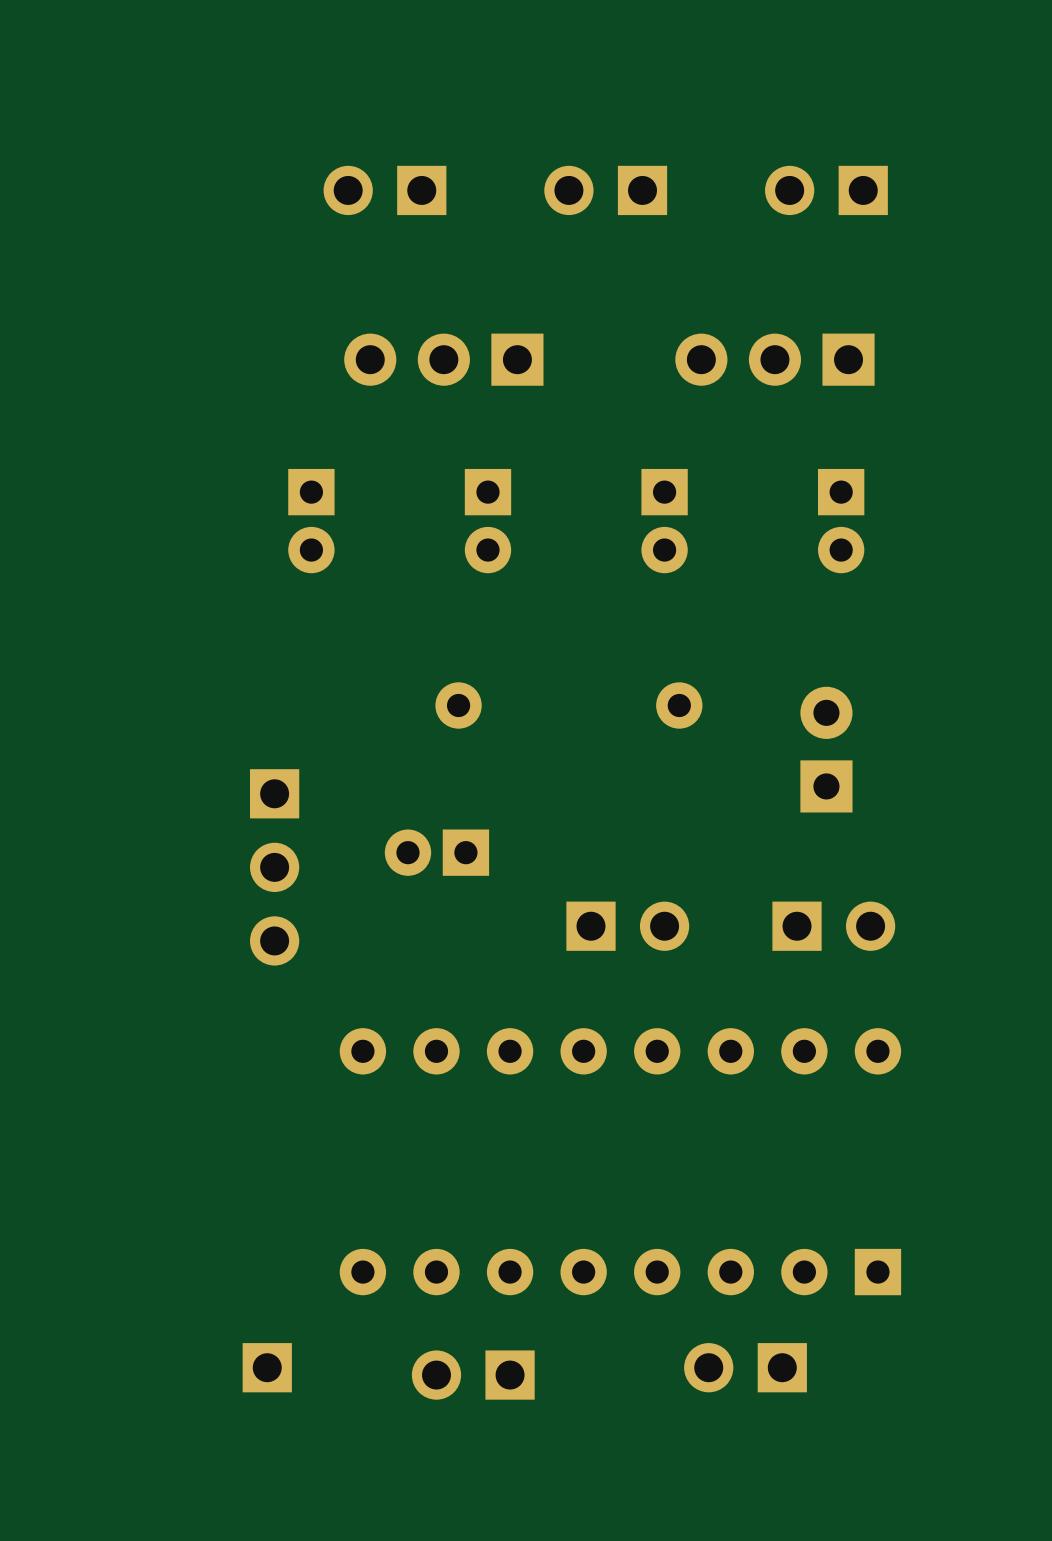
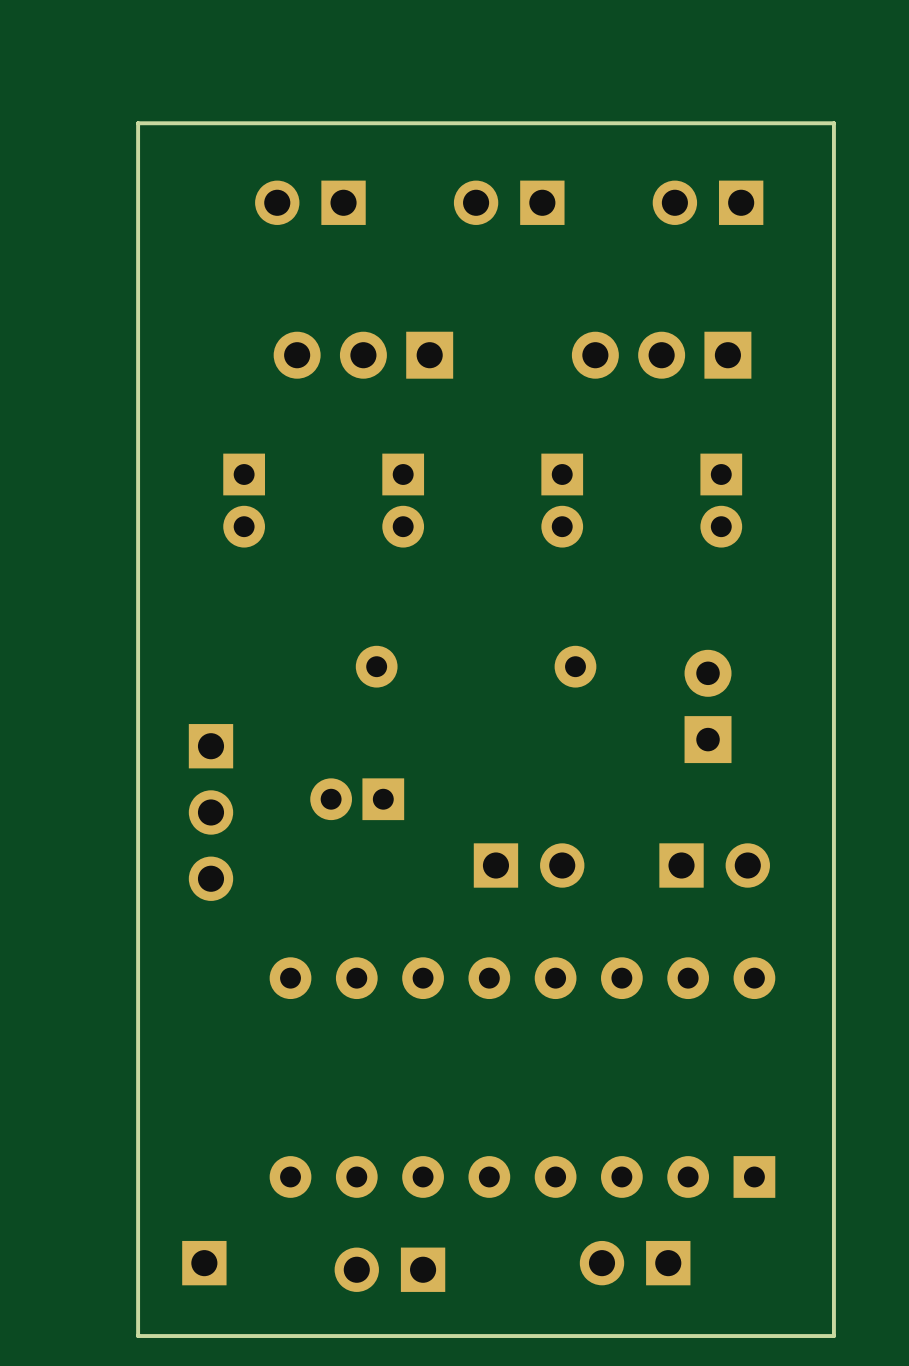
board edge: none -> (833, 123) (833, 1336) (138, 1336) (138, 123) (833, 123)

